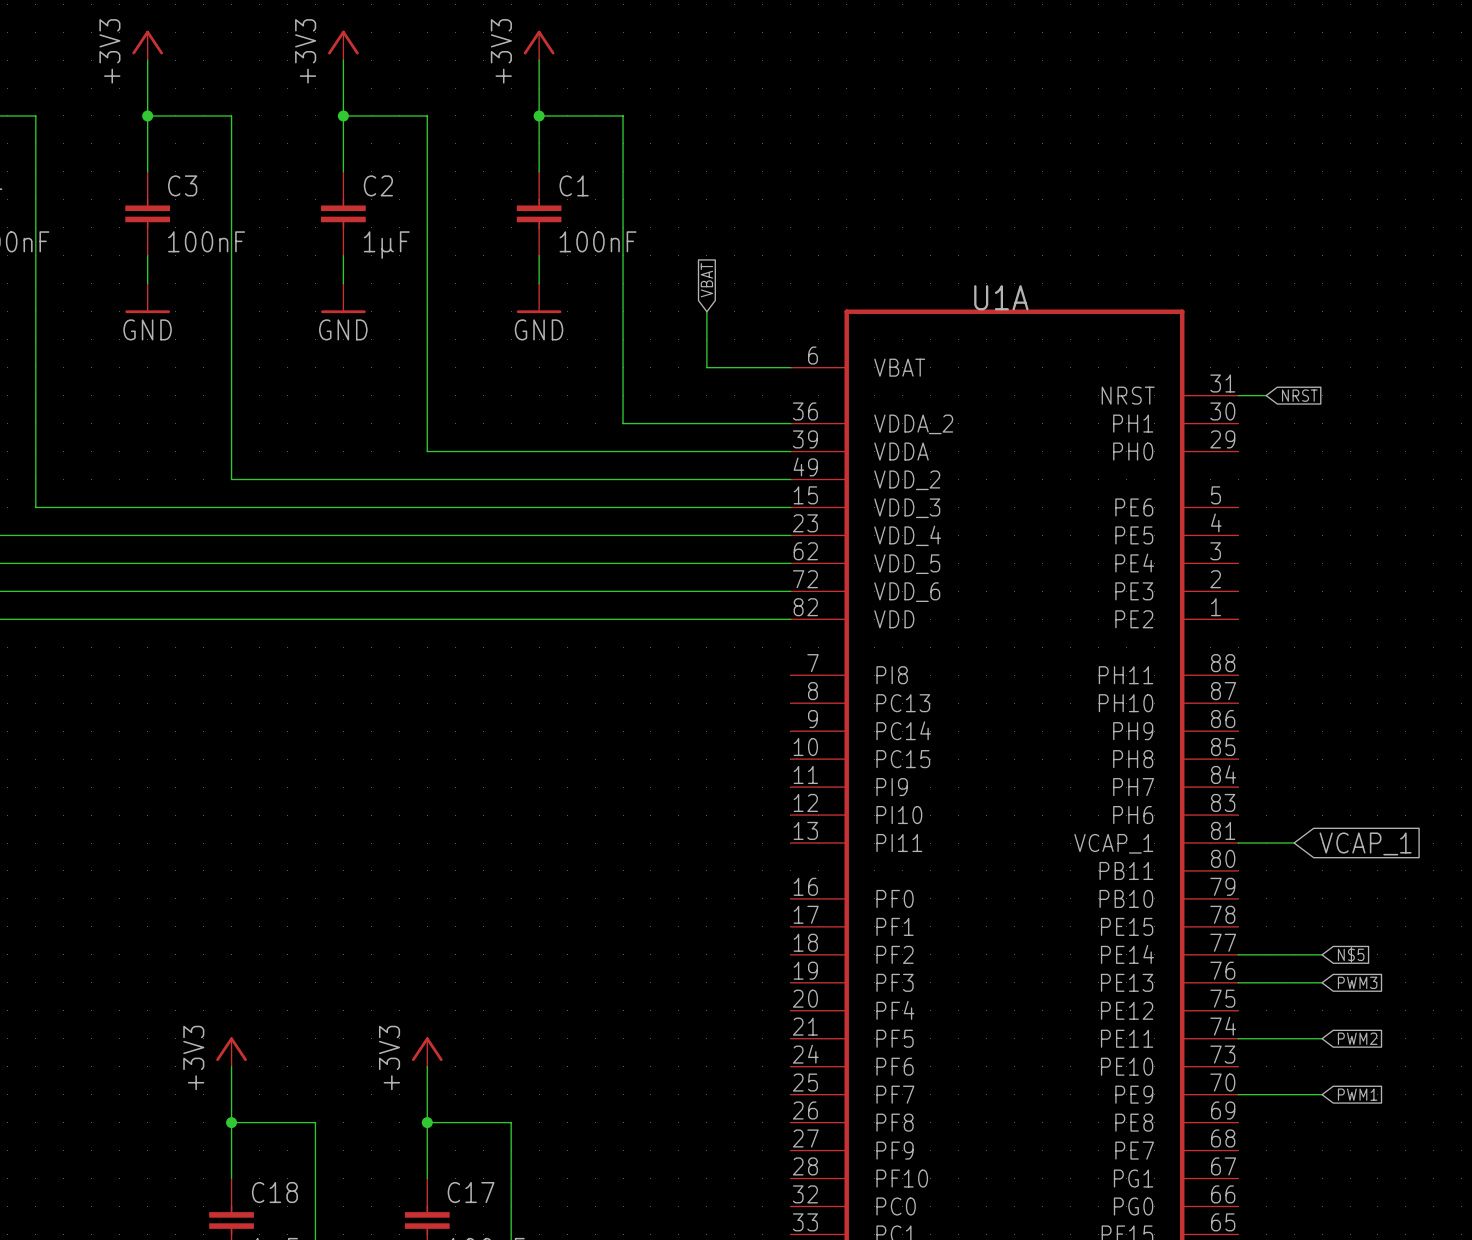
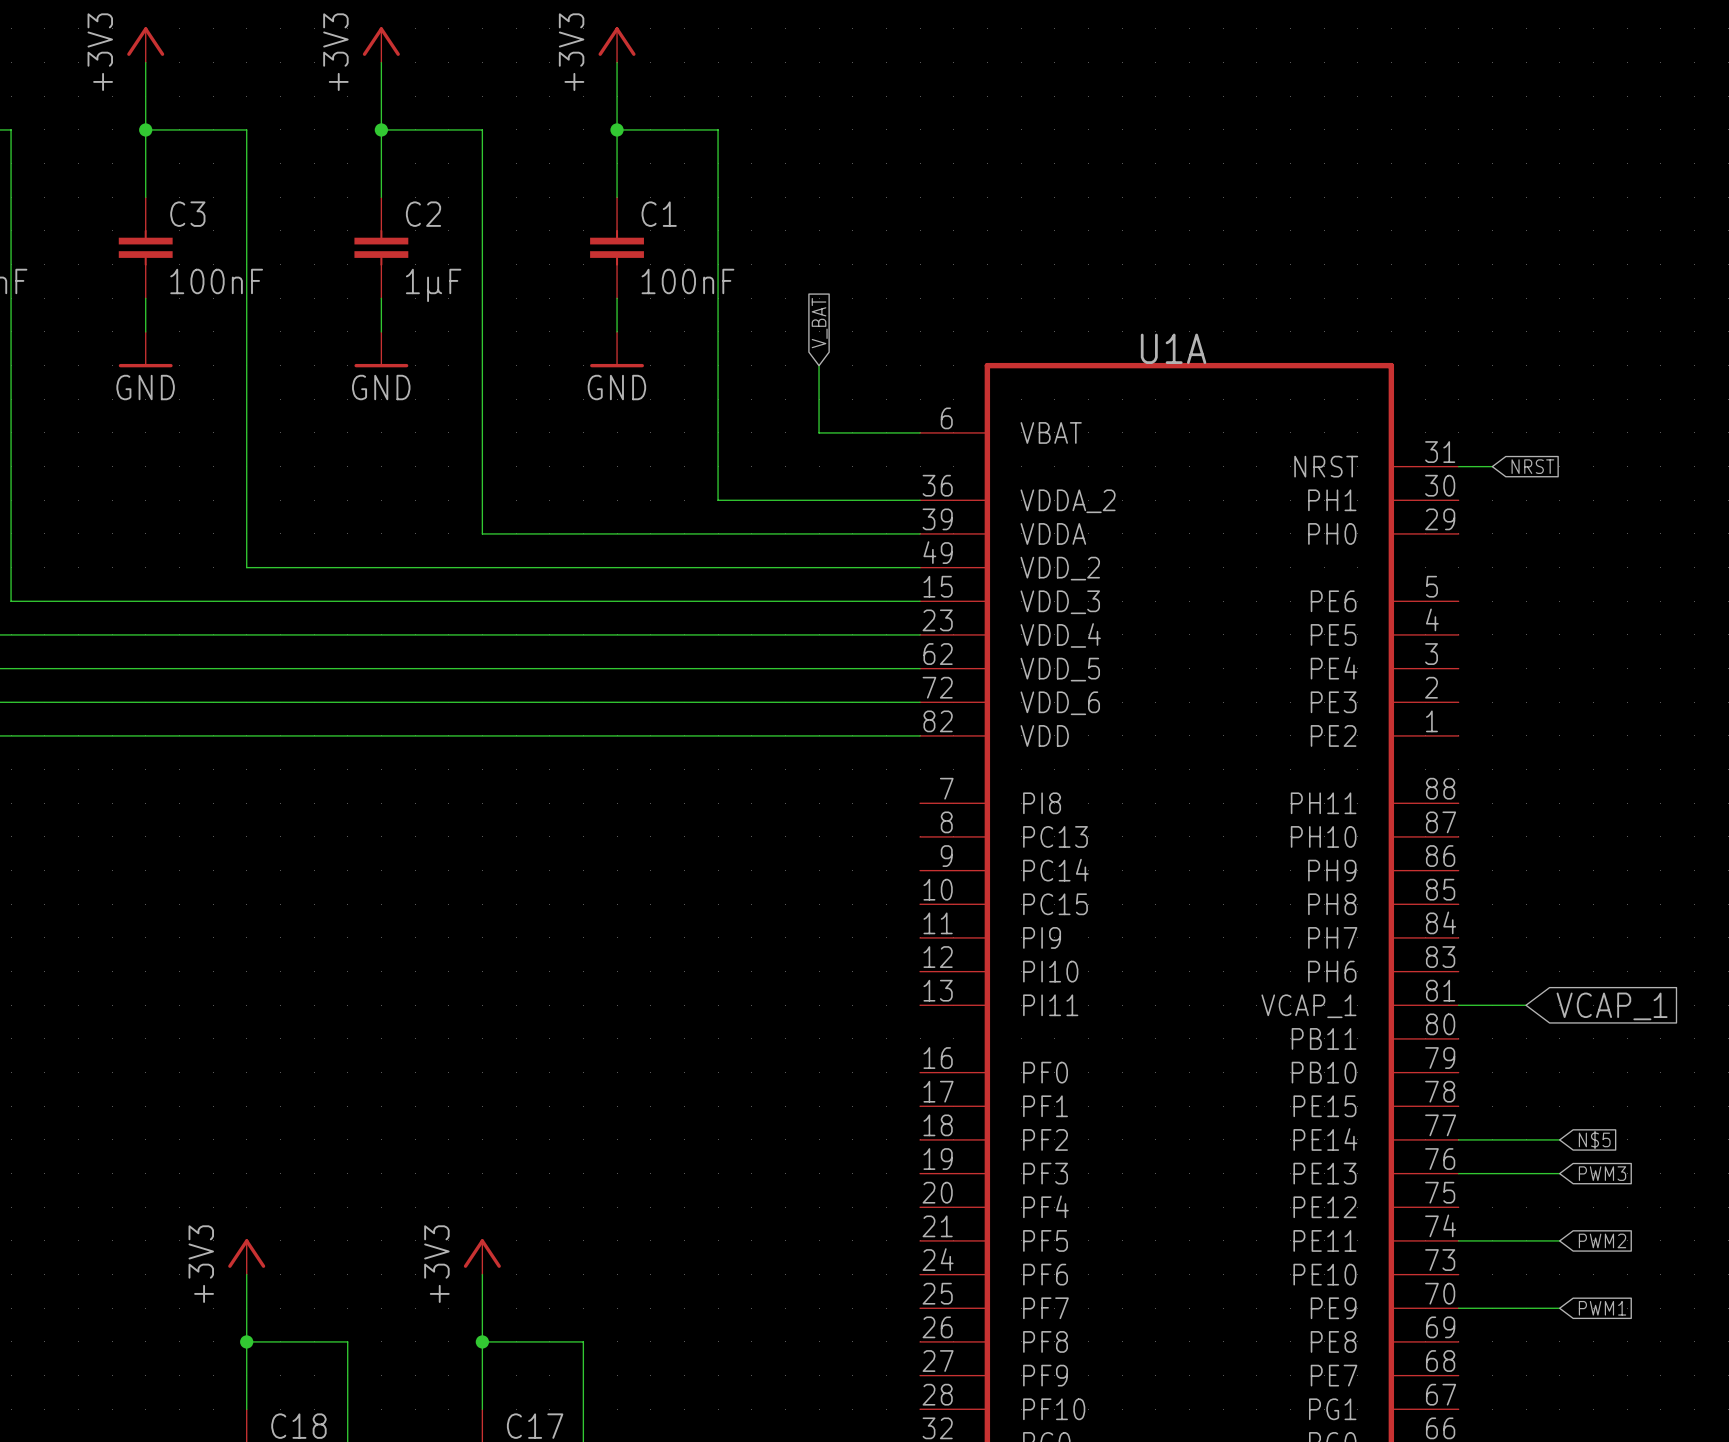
global label: VBAT (706, 280) -> V_BAT (819, 323)

